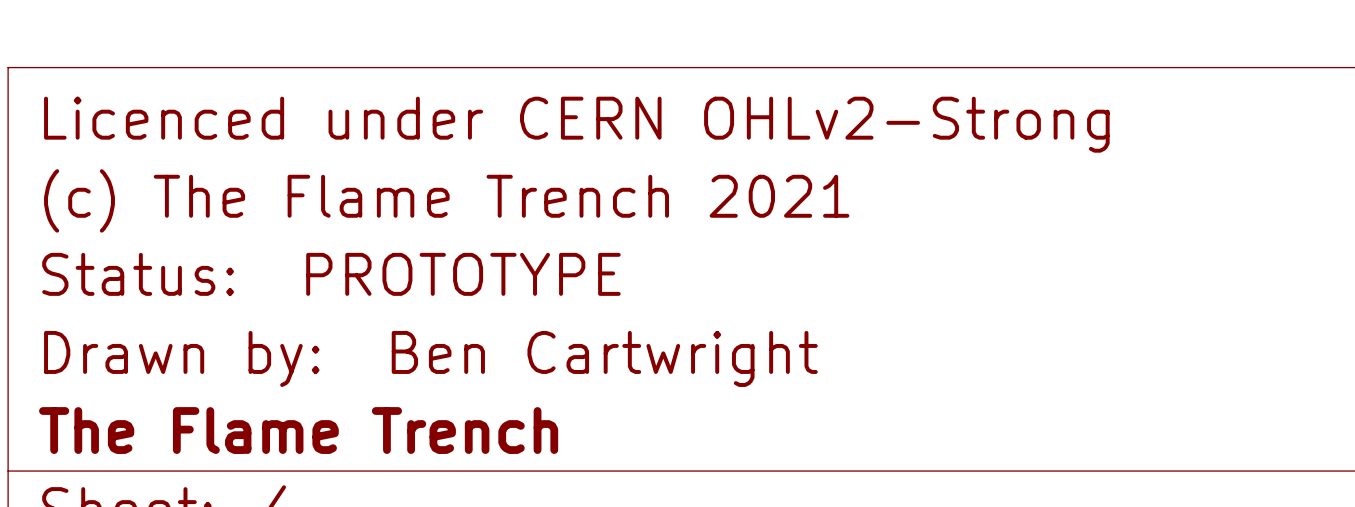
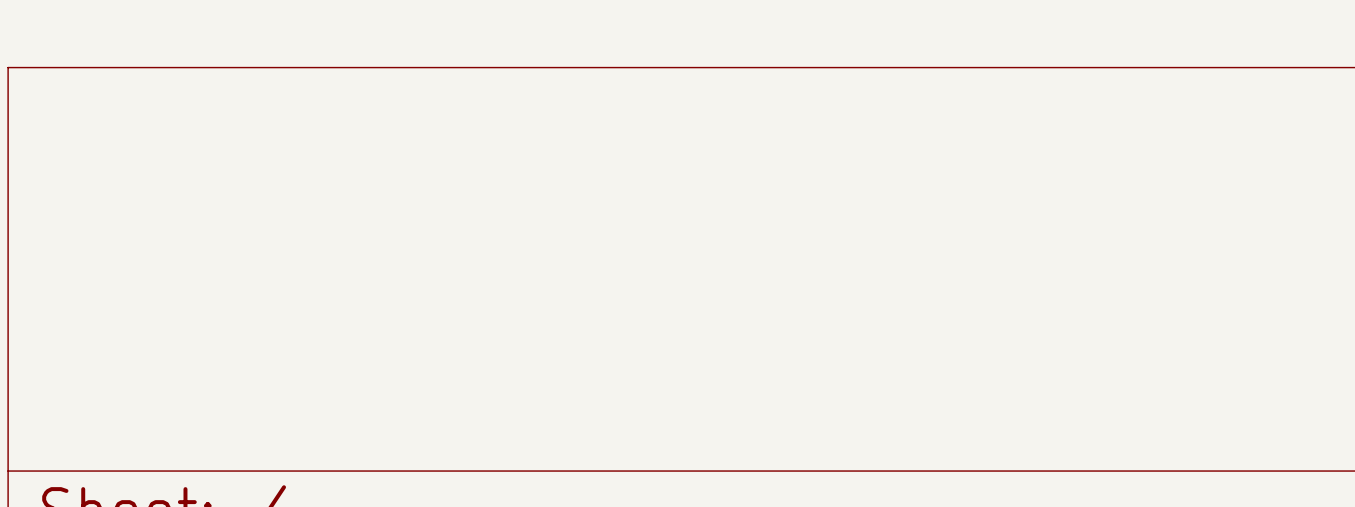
title block: Licenced under CERN OHLv2-Strong (576, 124) -> none
title block: (c) The Flame Trench 2021 (446, 200) -> none
title block: Status: PROTOTYPE (331, 274) -> none
title block: Drawn by: Ben Cartwright (430, 358) -> none
title block: The Flame Trench (298, 430) -> none

